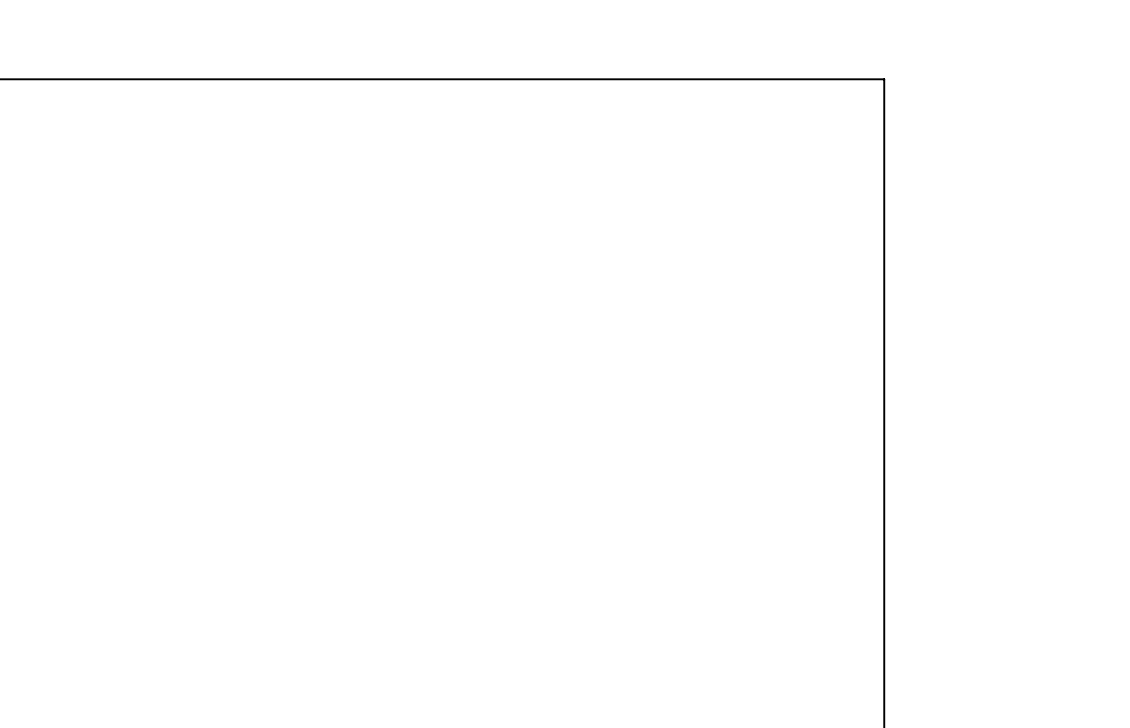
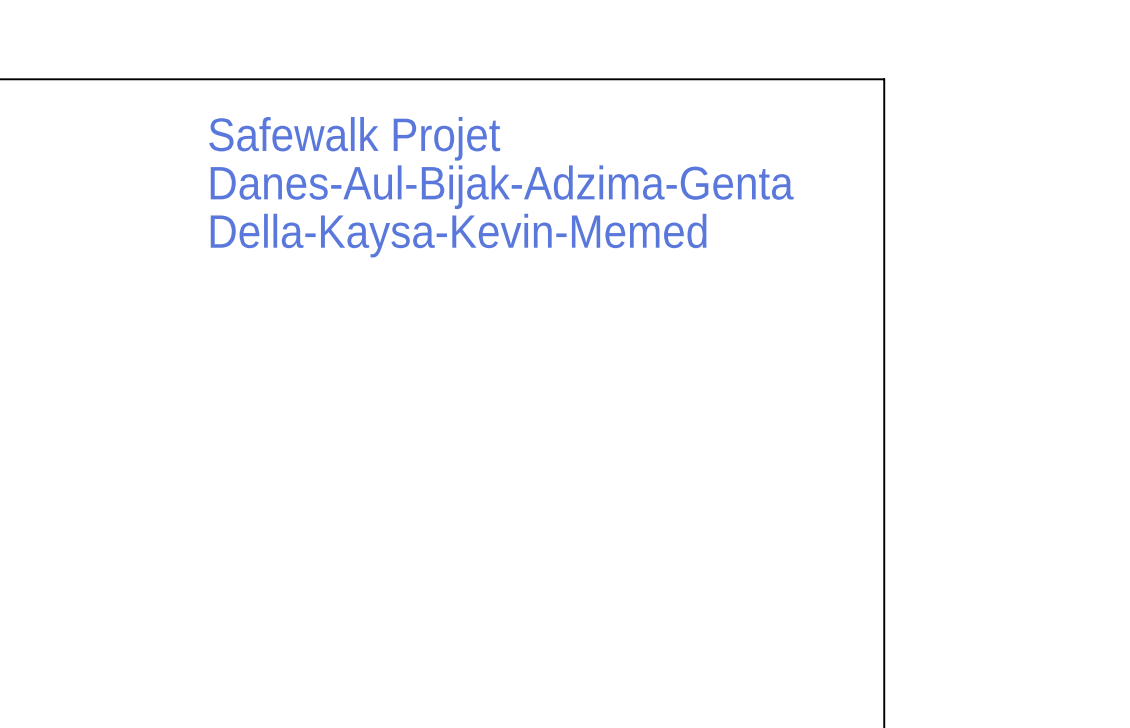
text: none -> Safewalk Projet (354, 138)
text: none -> Danes-Aul-Bijak-Adzima-Genta (502, 187)
text: none -> Della-Kaysa-Kevin-Memed (458, 235)

